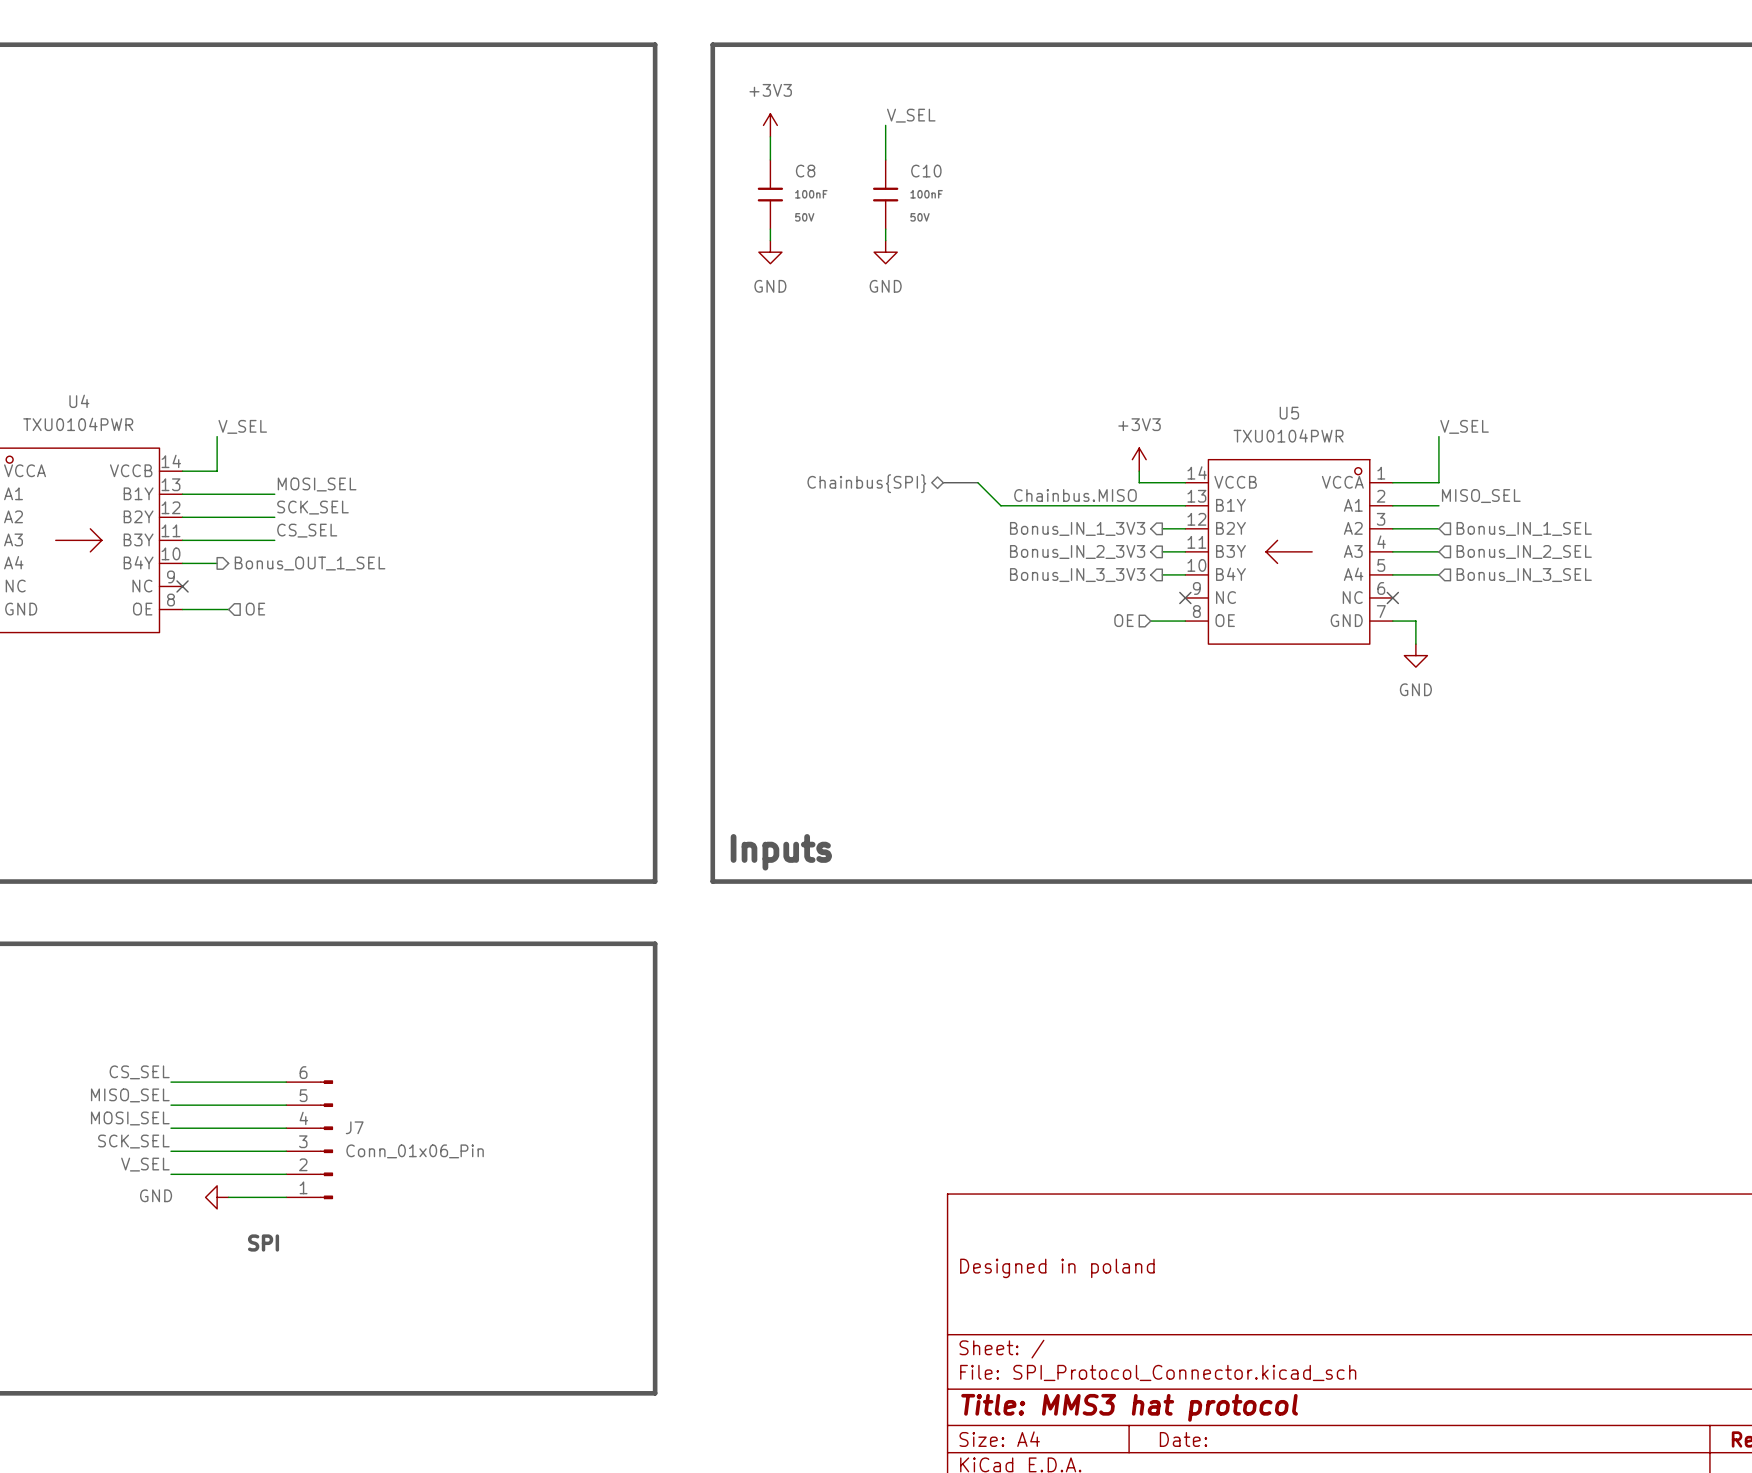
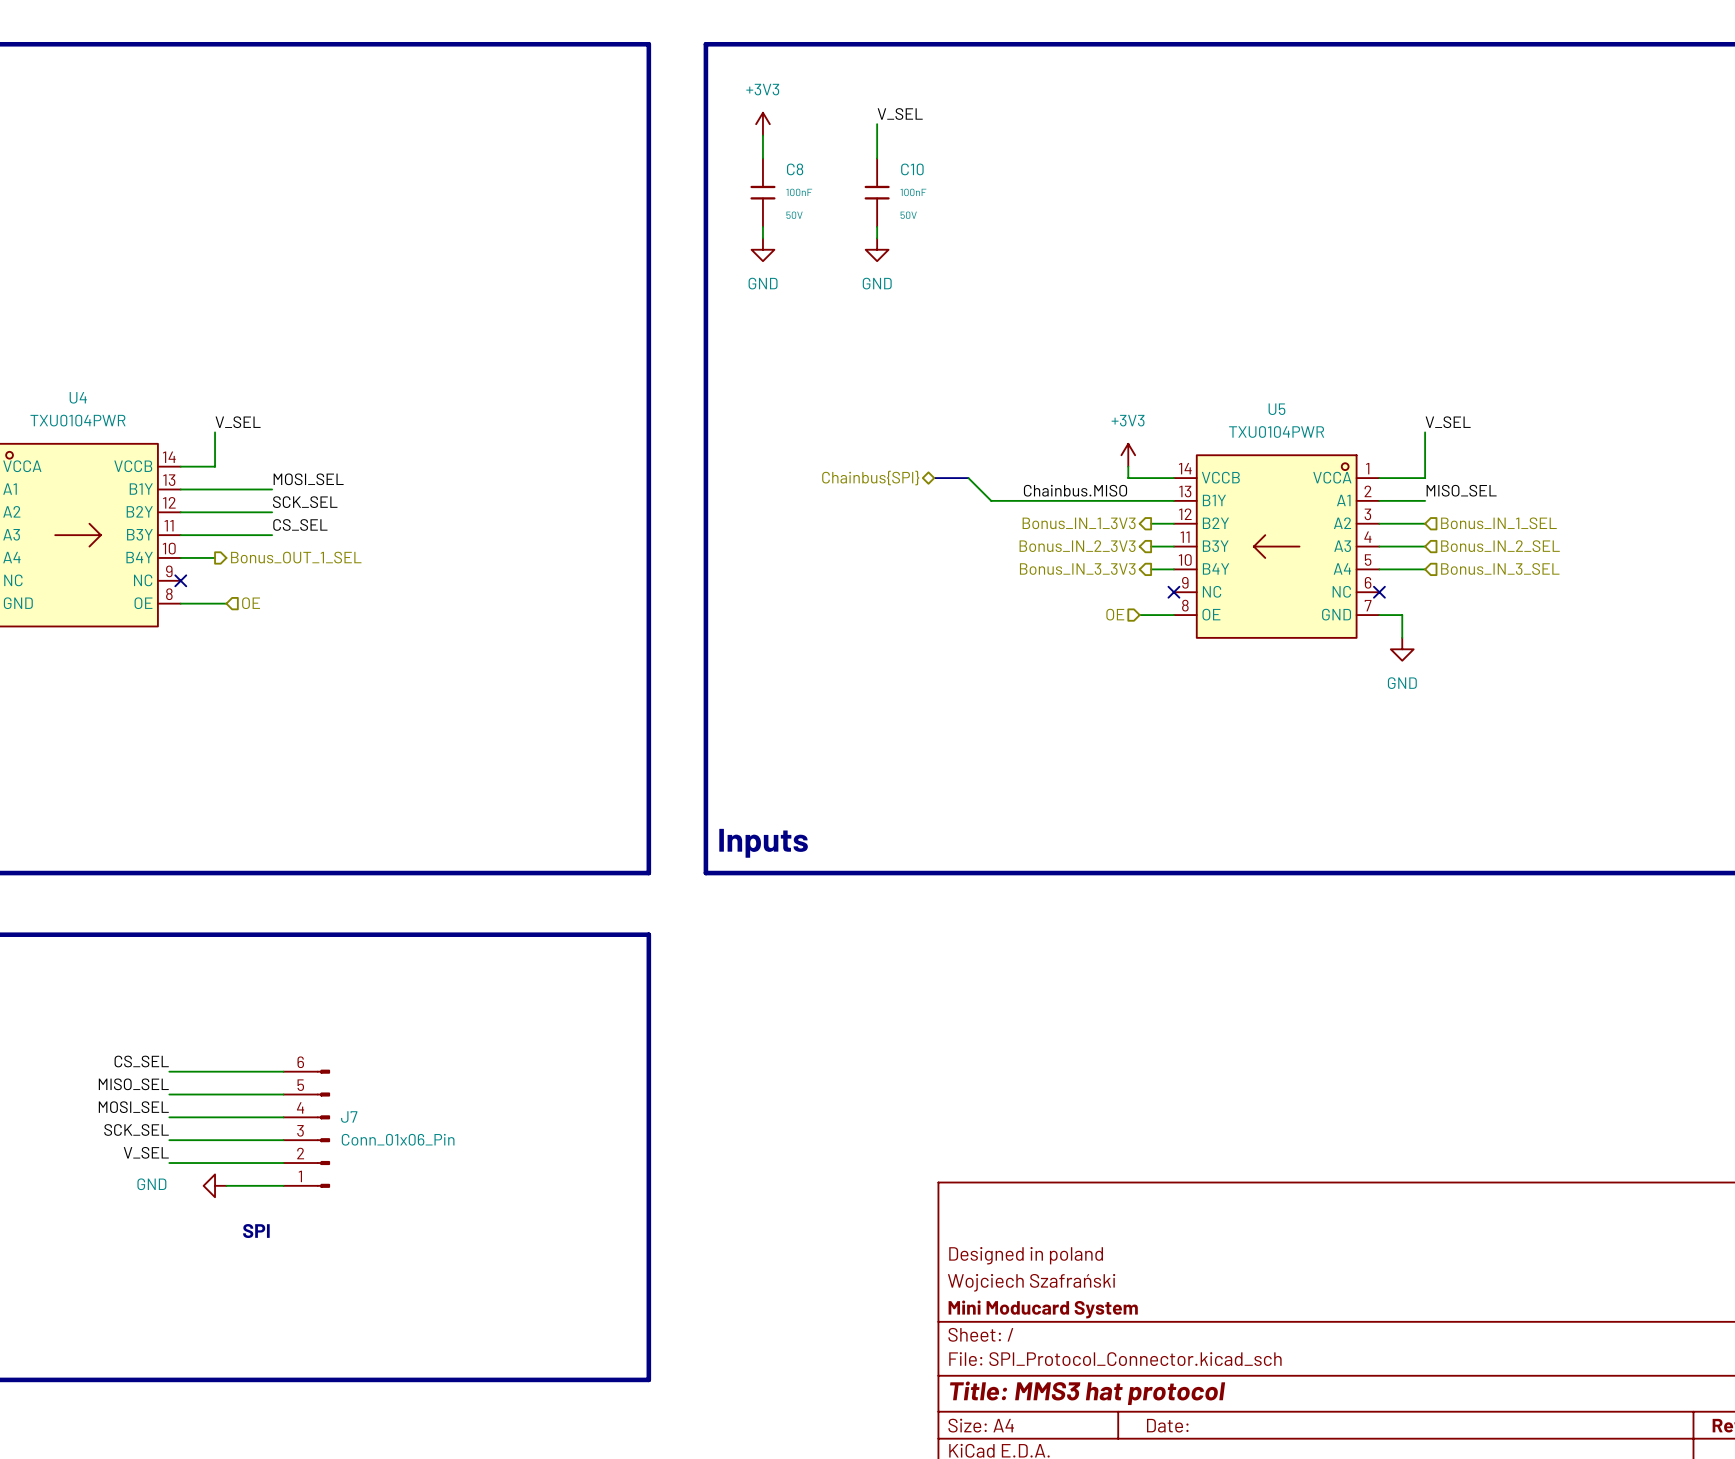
title block: none -> Wojciech Szafrański (1031, 1282)
title block: none -> Mini Moducard System (1043, 1309)

